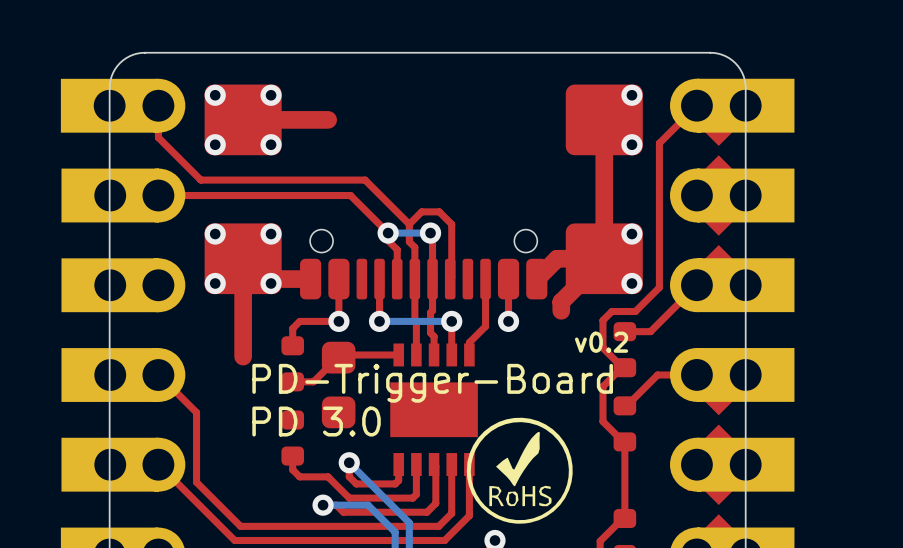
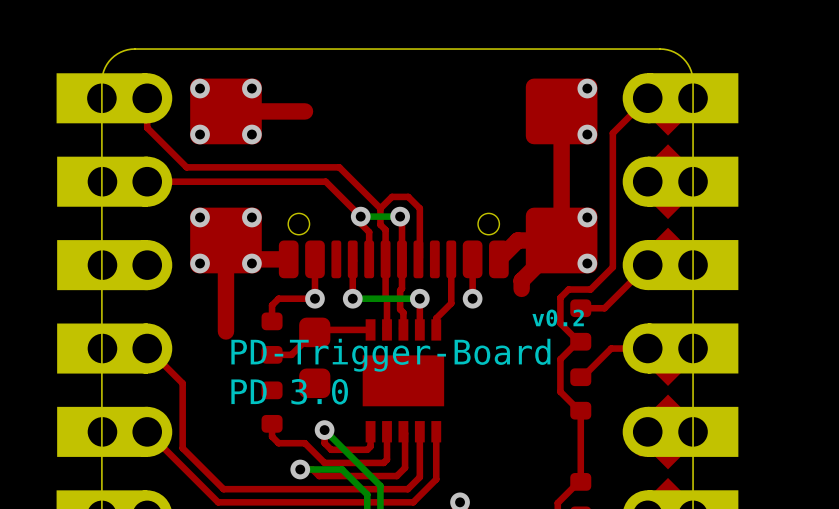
drawing: [466, 417, 573, 524] -> none

